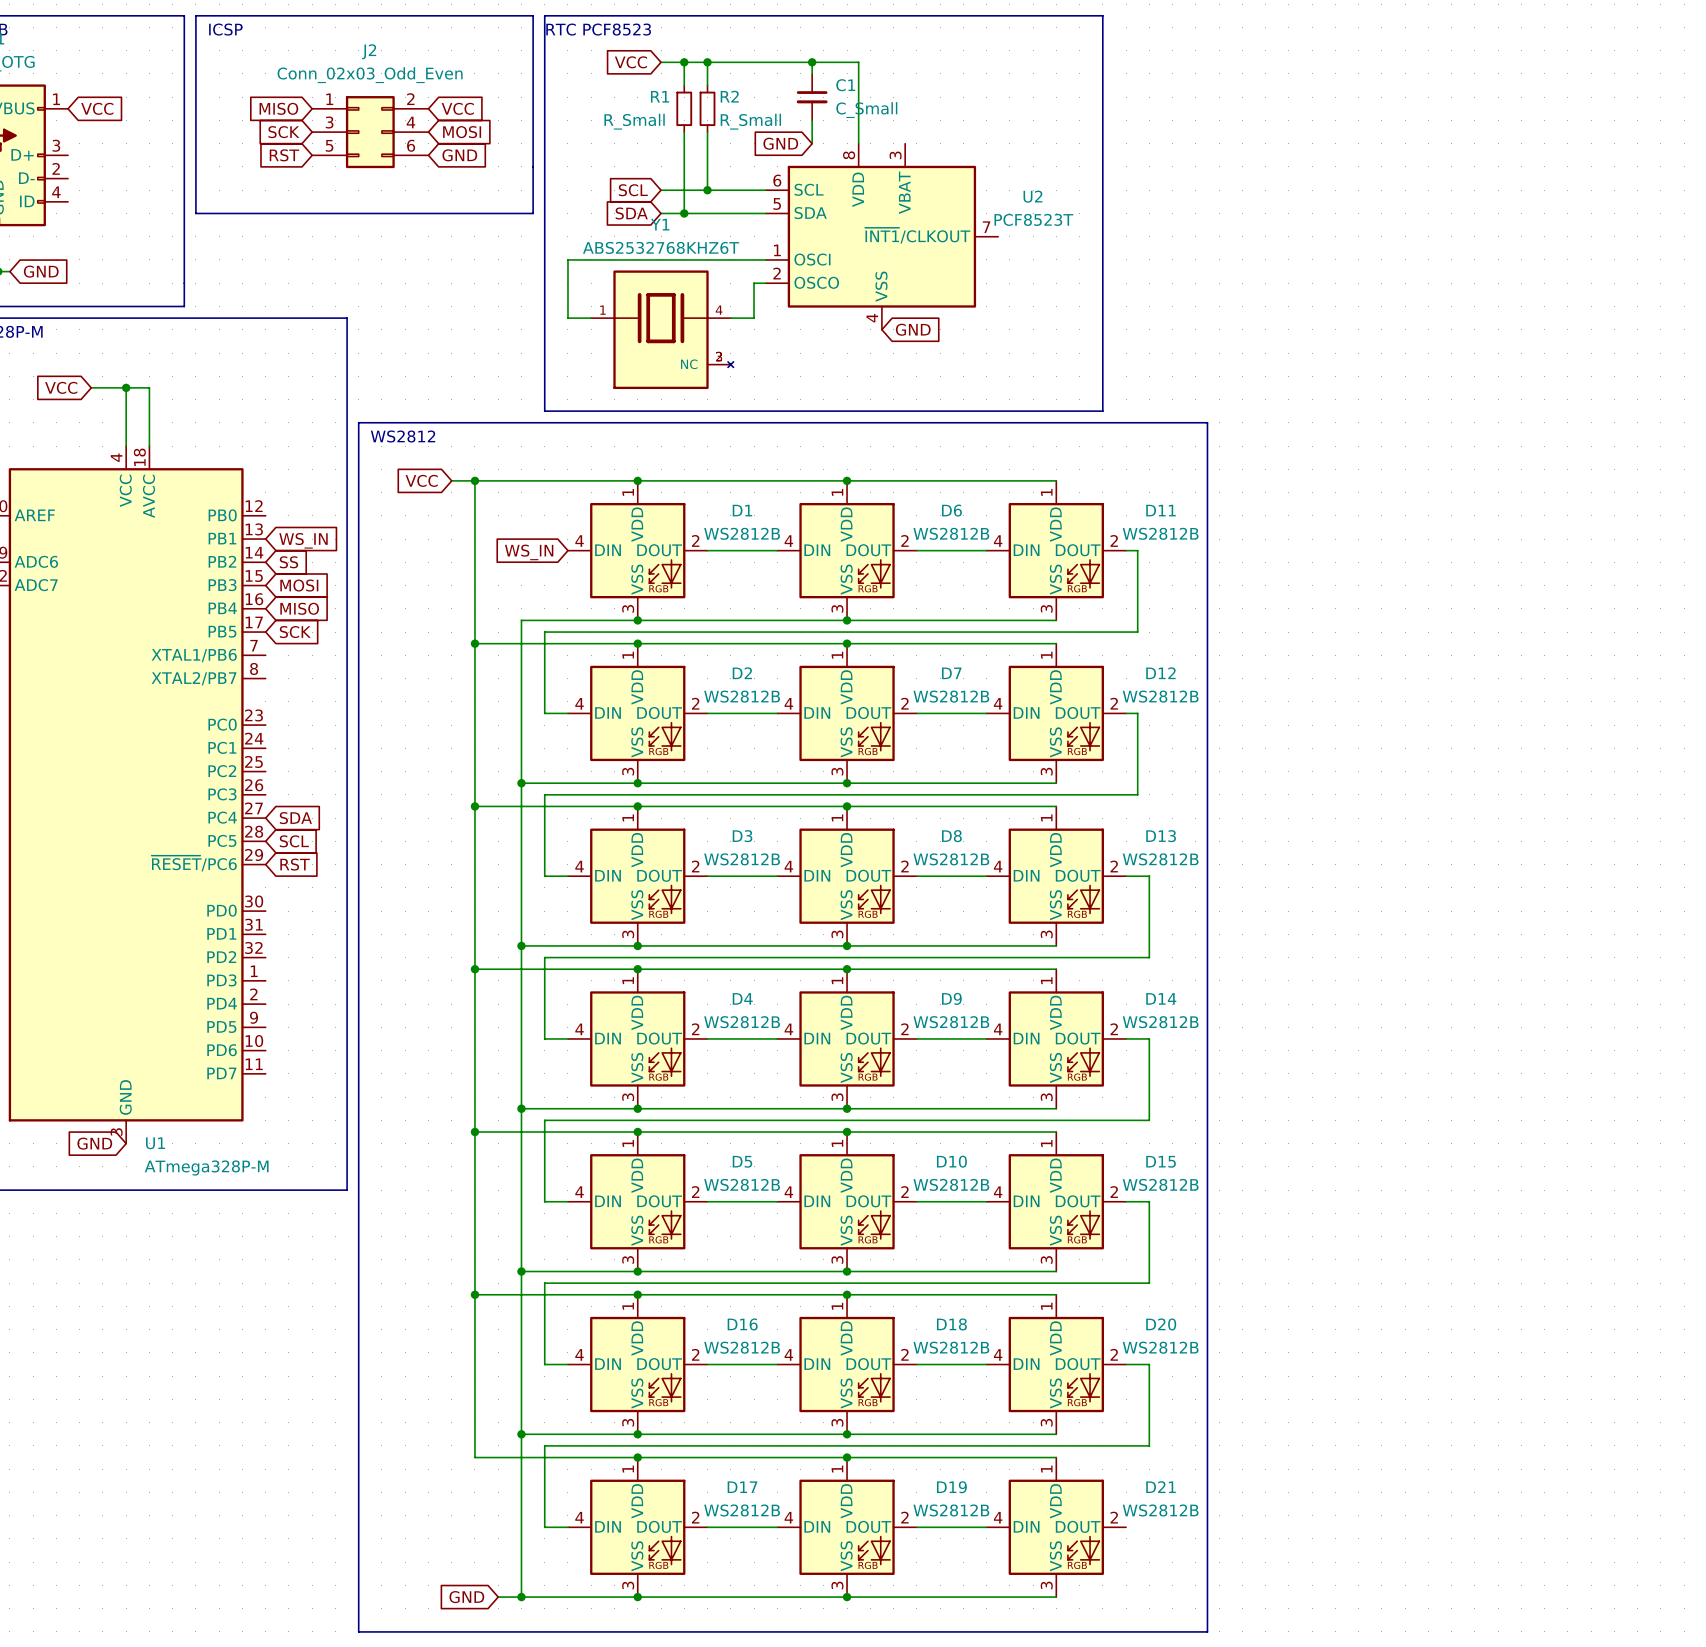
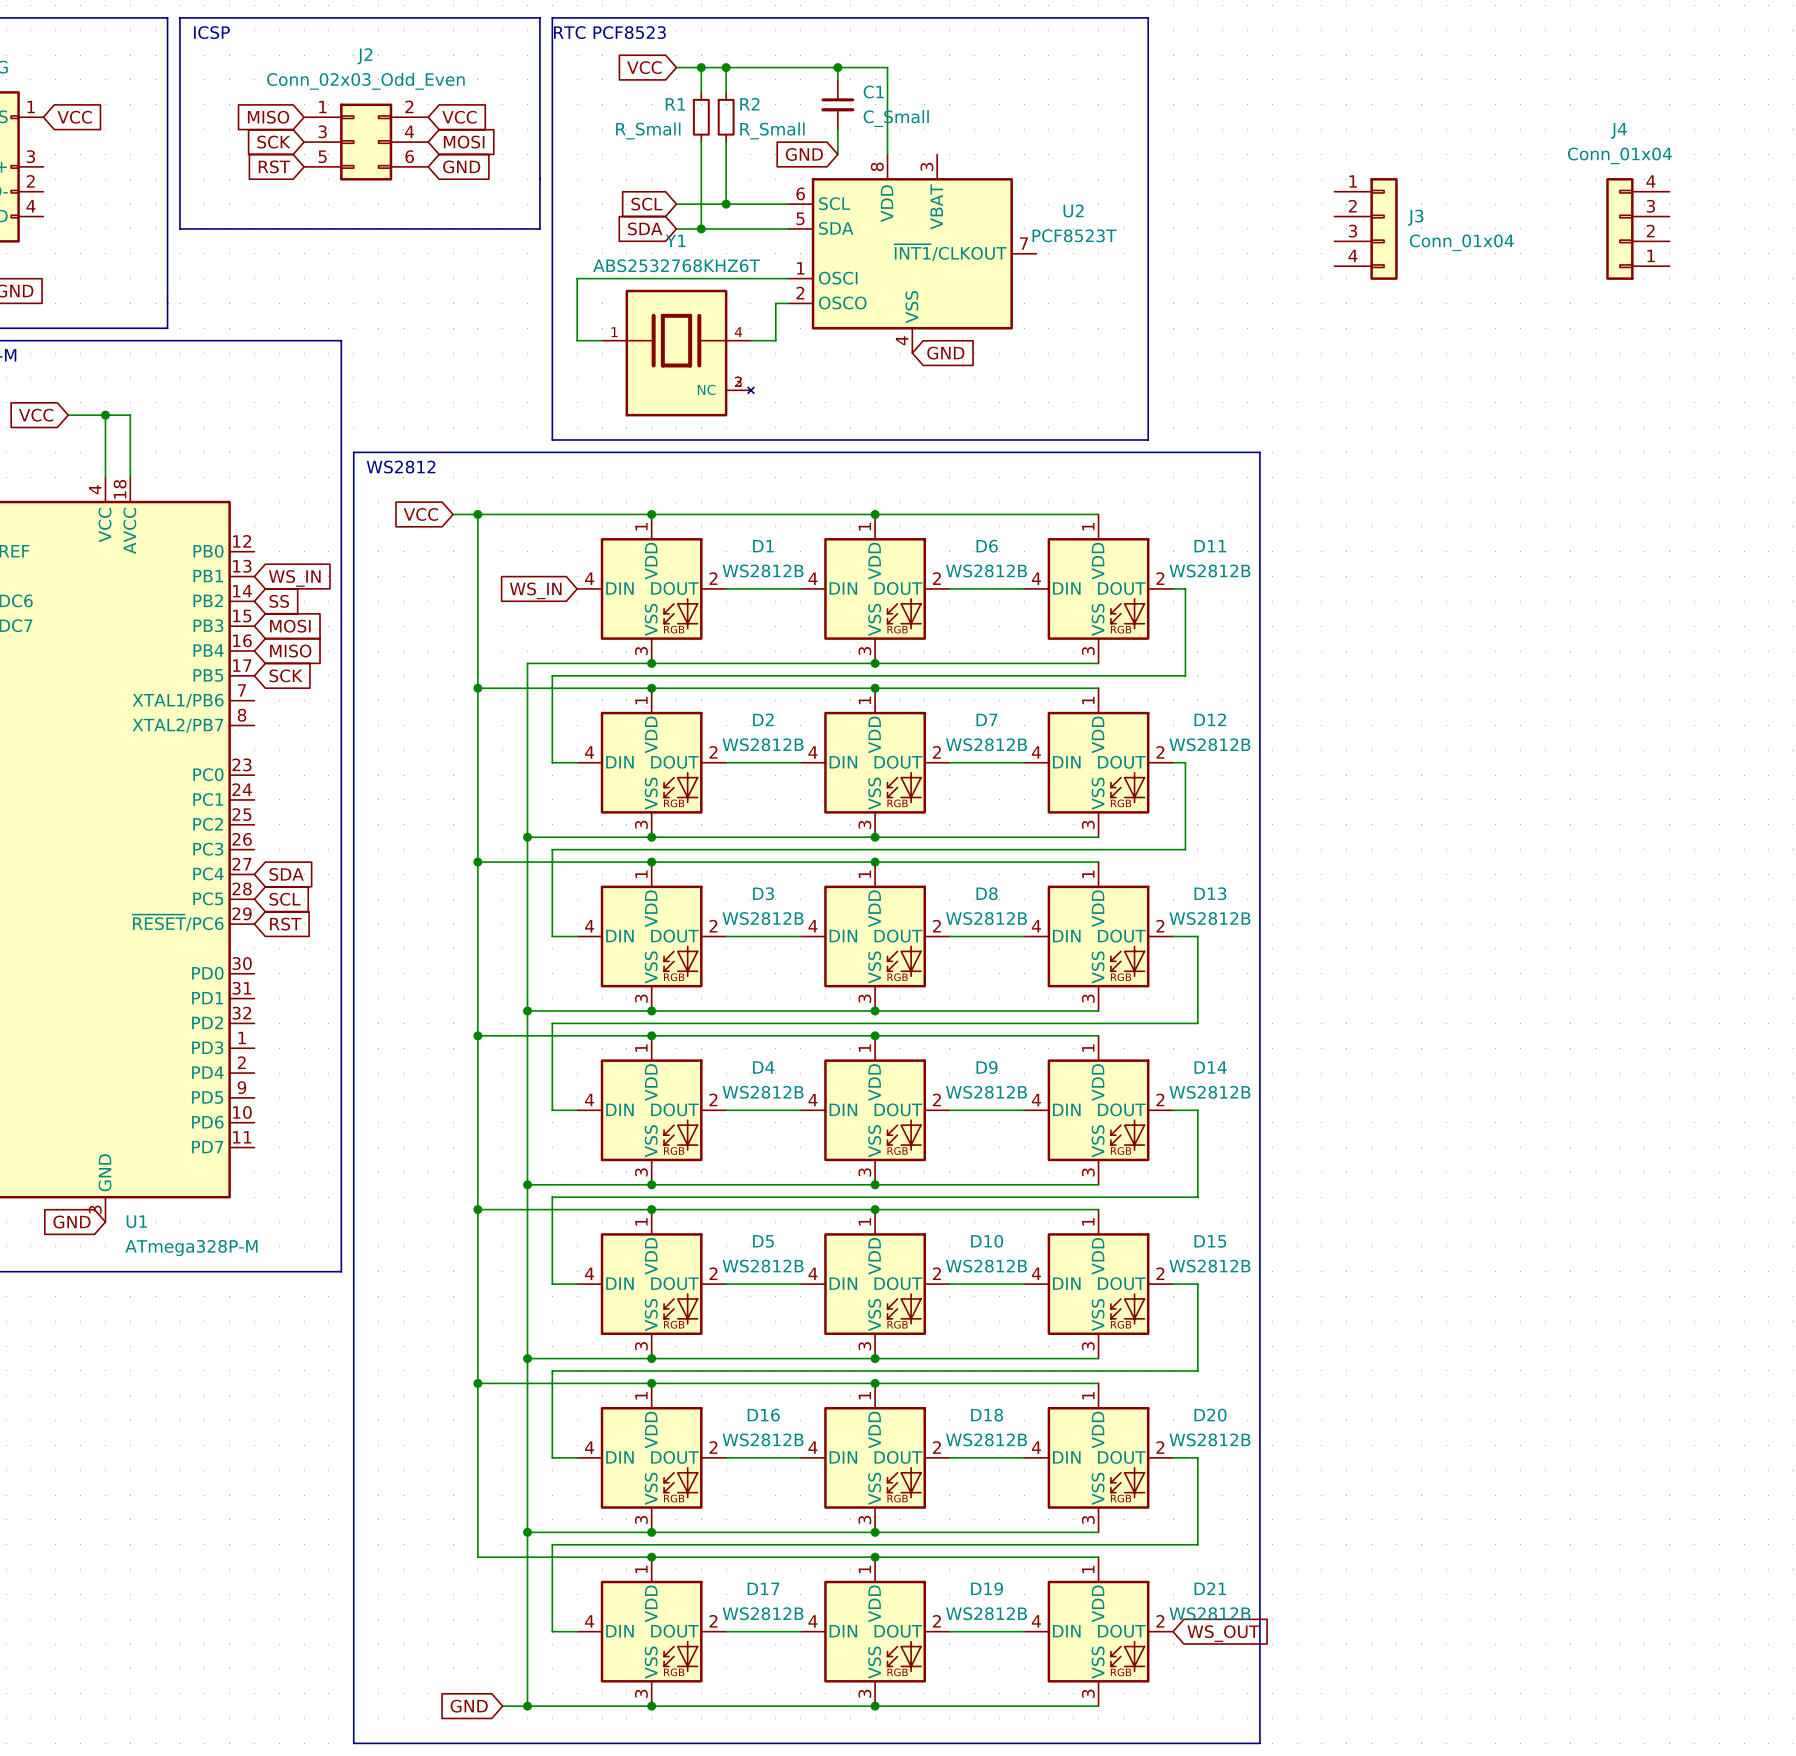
J3: none -> Conn_01x04 (1366, 228)
J4: none -> Conn_01x04 (1637, 228)
global label: none -> WS_OUT (1223, 1633)

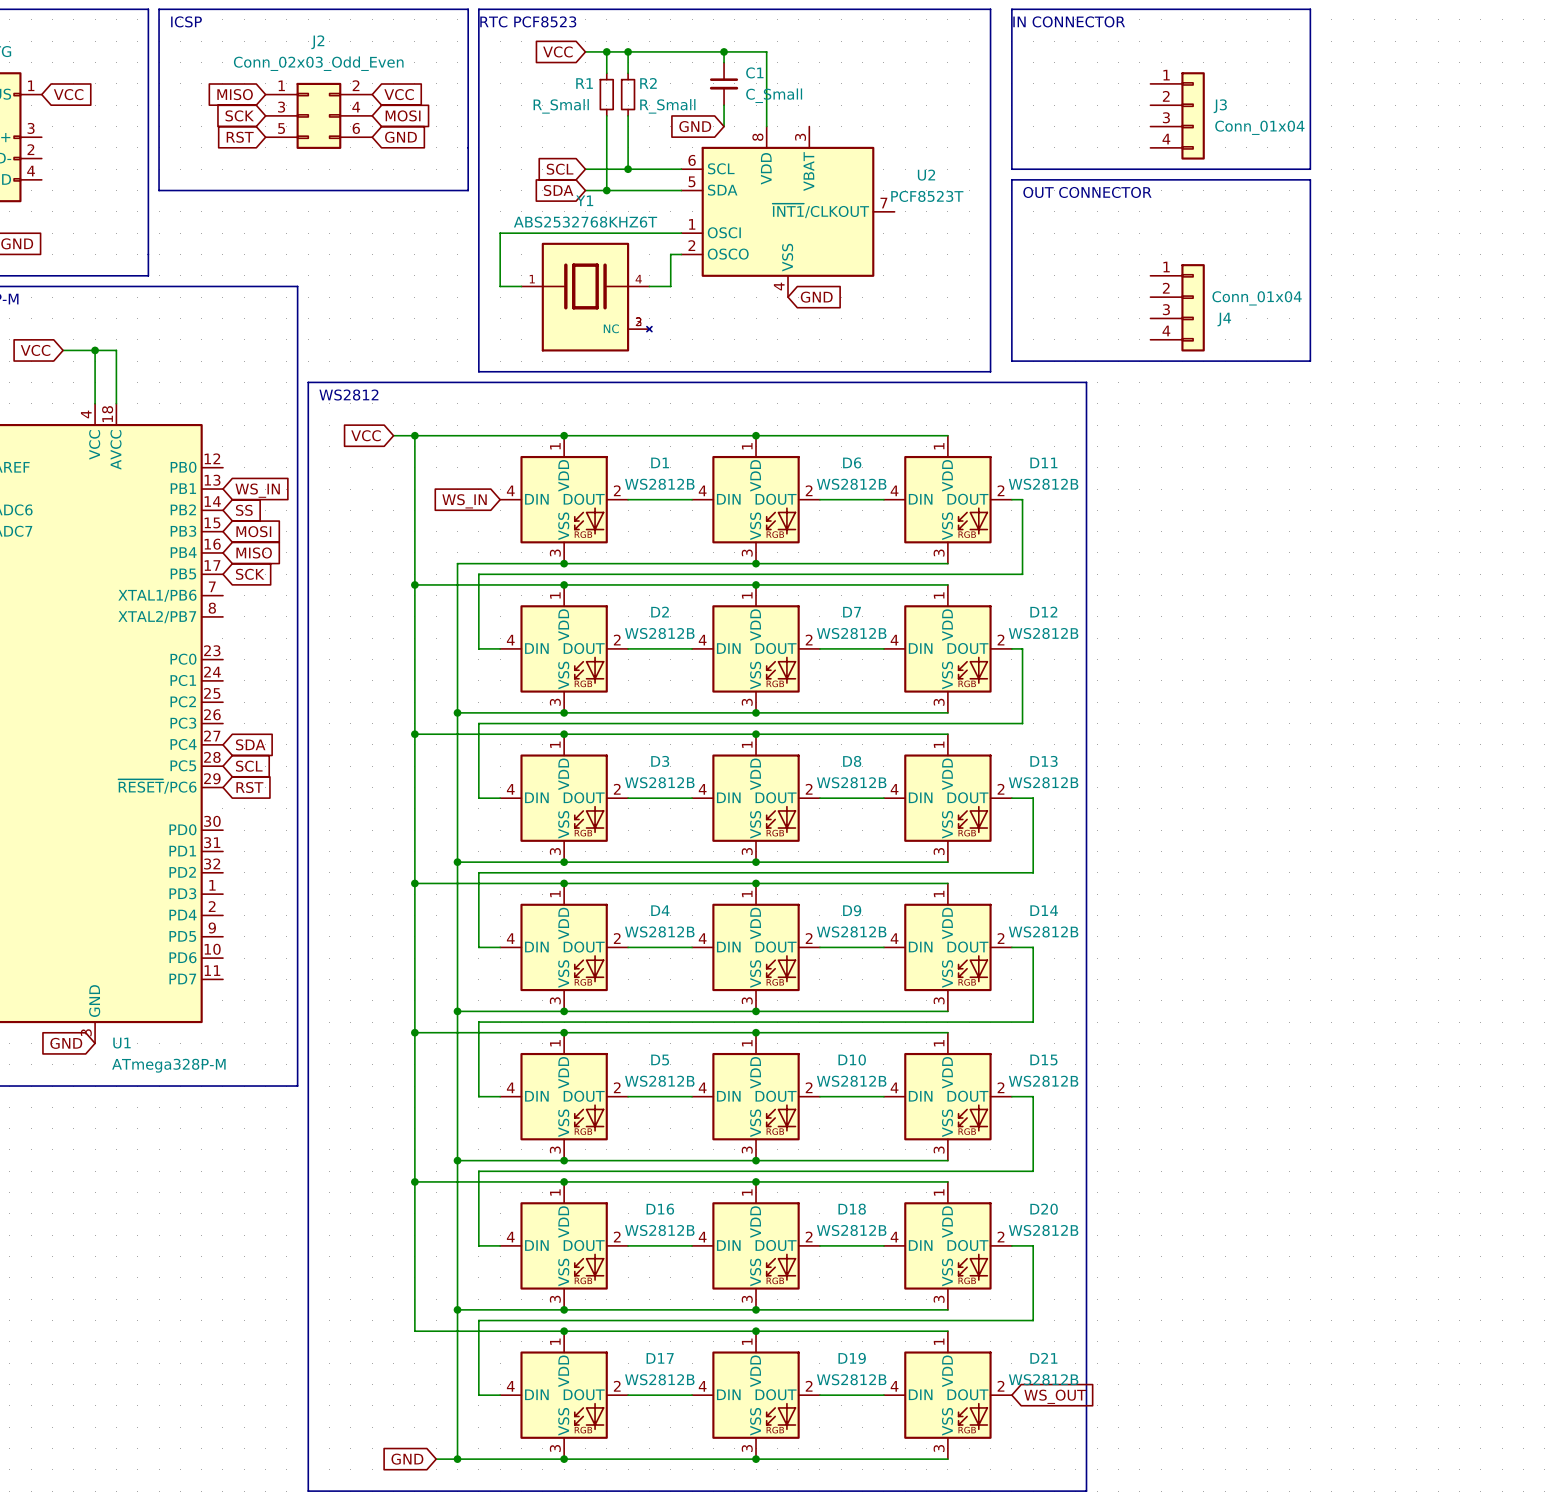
line: none -> (1011, 9) (1011, 169) (1310, 169) (1310, 9) (1011, 9)
text: none -> IN CONNECTOR (1069, 21)
J4 name position: J4 (1618, 130) -> J4 (1224, 319)
J4 value position: Conn_01x04 (1619, 155) -> Conn_01x04 (1257, 298)
line: none -> (1011, 179) (1011, 361) (1310, 361) (1310, 179) (1011, 179)
J3 position: (1366, 228) -> (1177, 115)
J4 rotation: 0° (1619, 228) -> 180° (1193, 307)
J4 position: (1637, 228) -> (1177, 307)
text: none -> OUT CONNECTOR (1087, 192)

